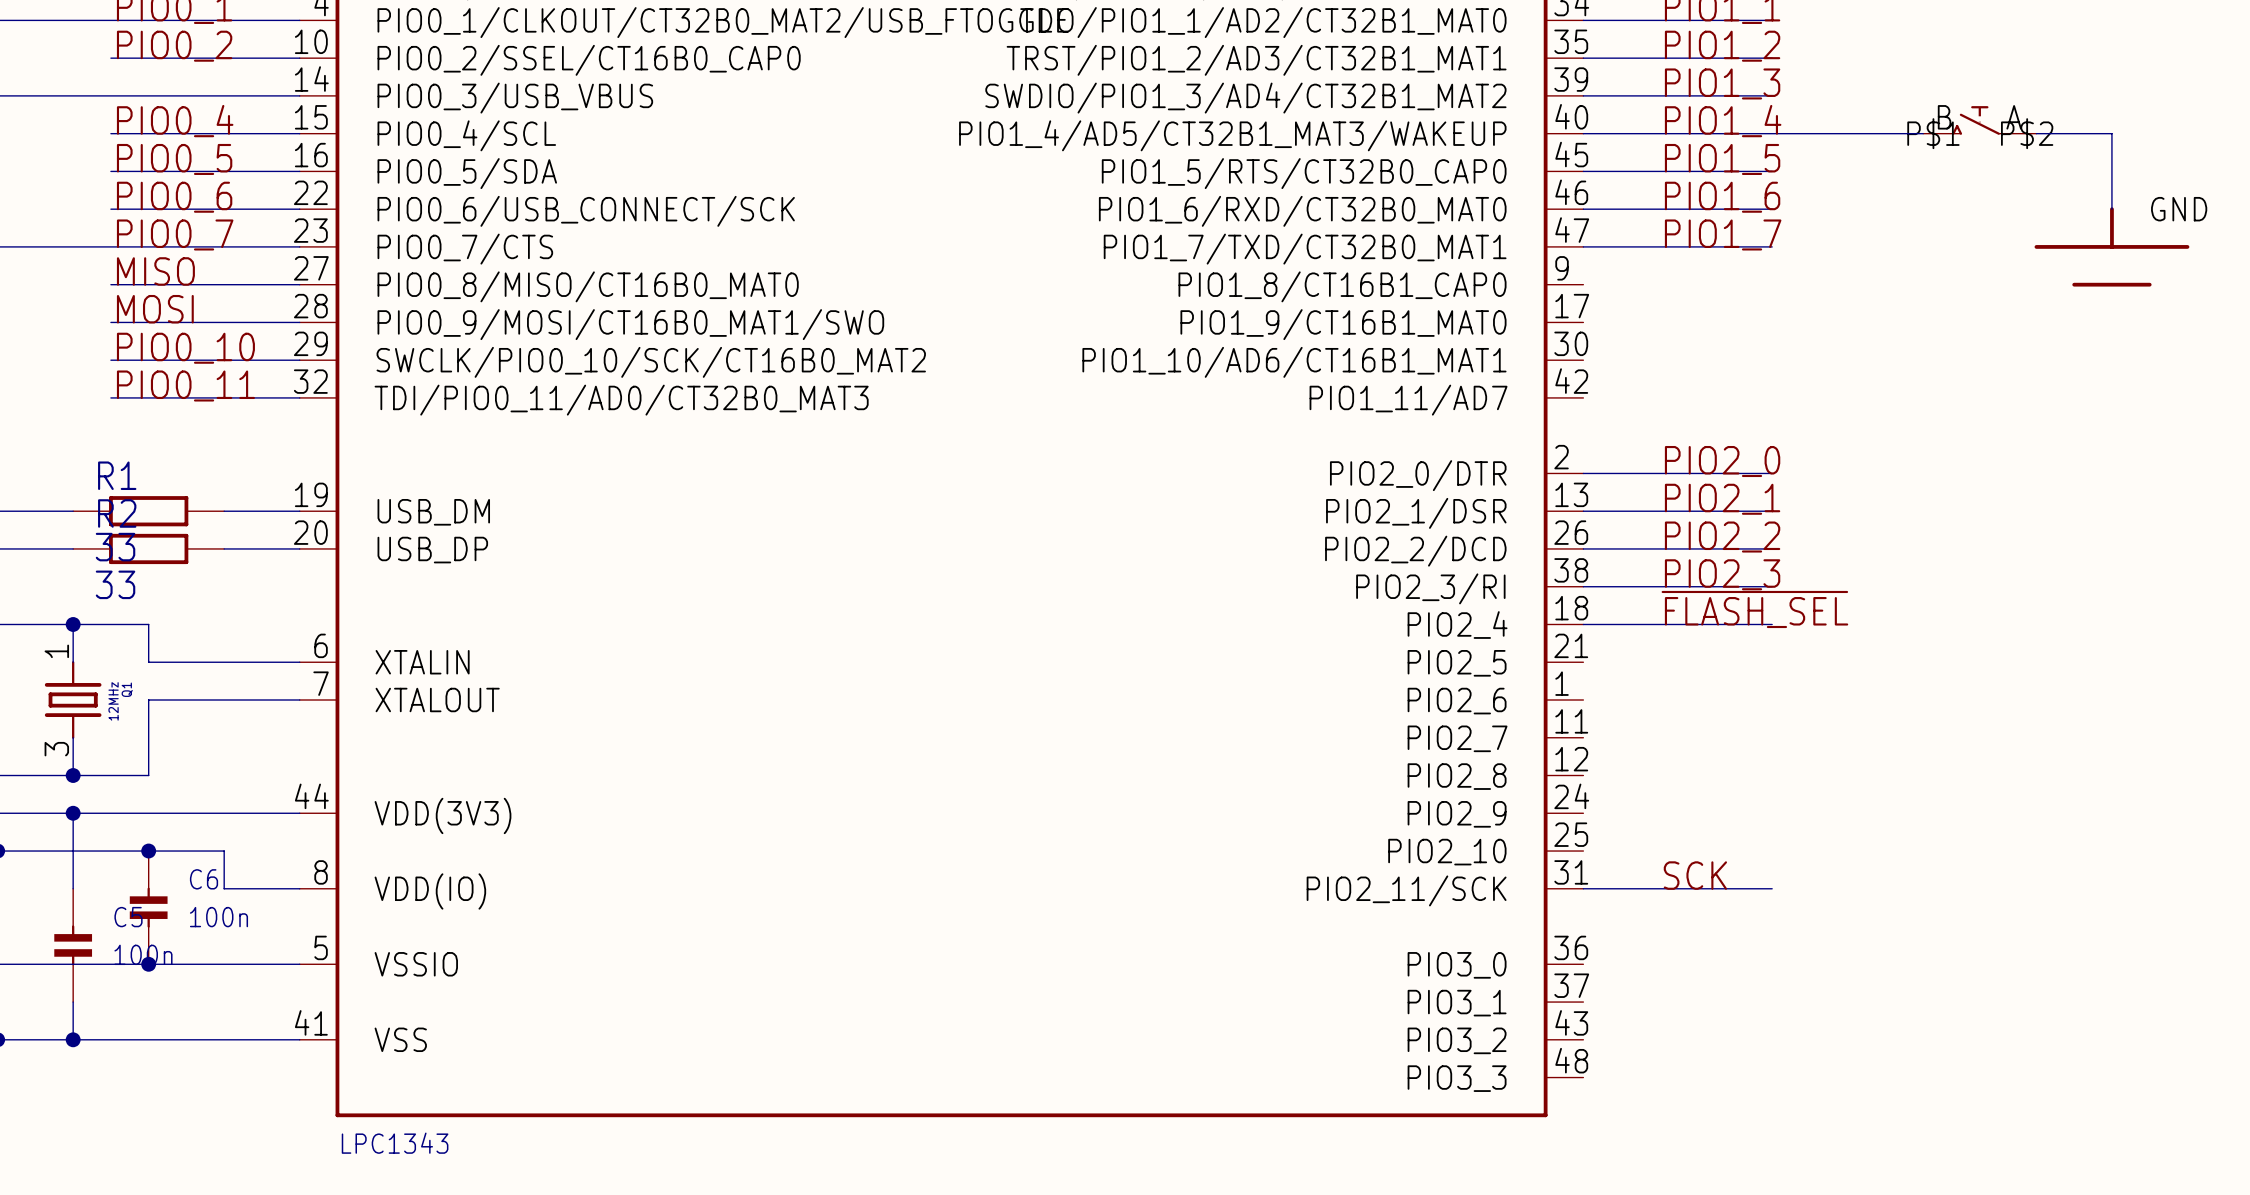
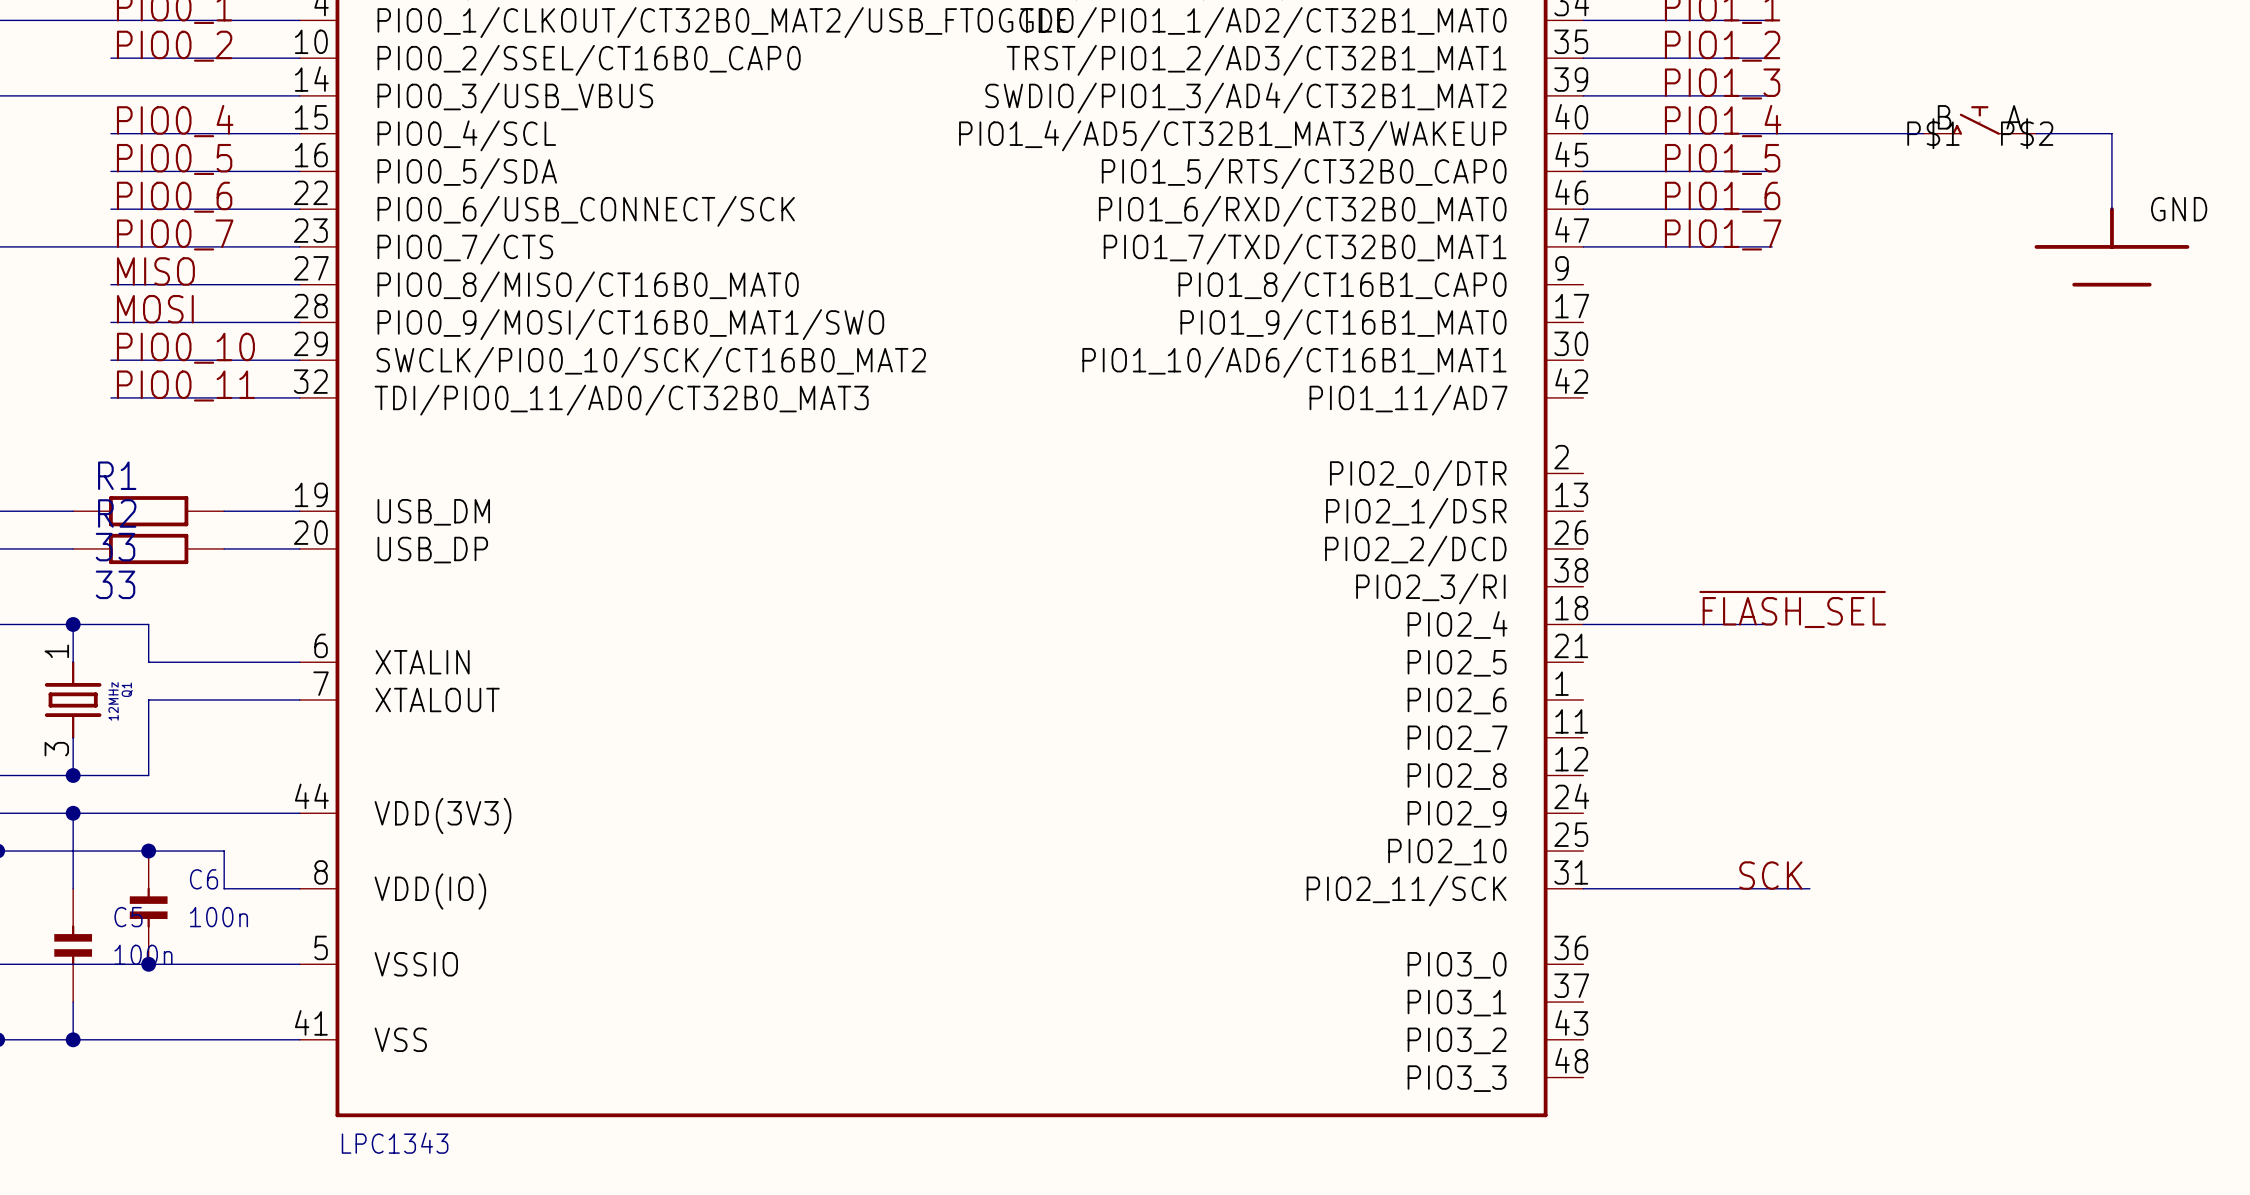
label: PIO2_0 (1722, 461) -> none
wire: (1583, 473) (1772, 473) -> none
label: PIO2_1 (1722, 499) -> none
wire: (1583, 511) (1772, 511) -> none
label: PIO2_2 (1722, 537) -> none
wire: (1583, 548) (1772, 548) -> none
label: PIO2_3 (1722, 574) -> none
wire: (1583, 586) (1772, 586) -> none
label position: ~{FLASH_SEL} (1754, 609) -> ~{FLASH_SEL} (1792, 609)
label position: SCK (1695, 875) -> SCK (1770, 875)
wire: none -> (1772, 888) (1809, 888)

